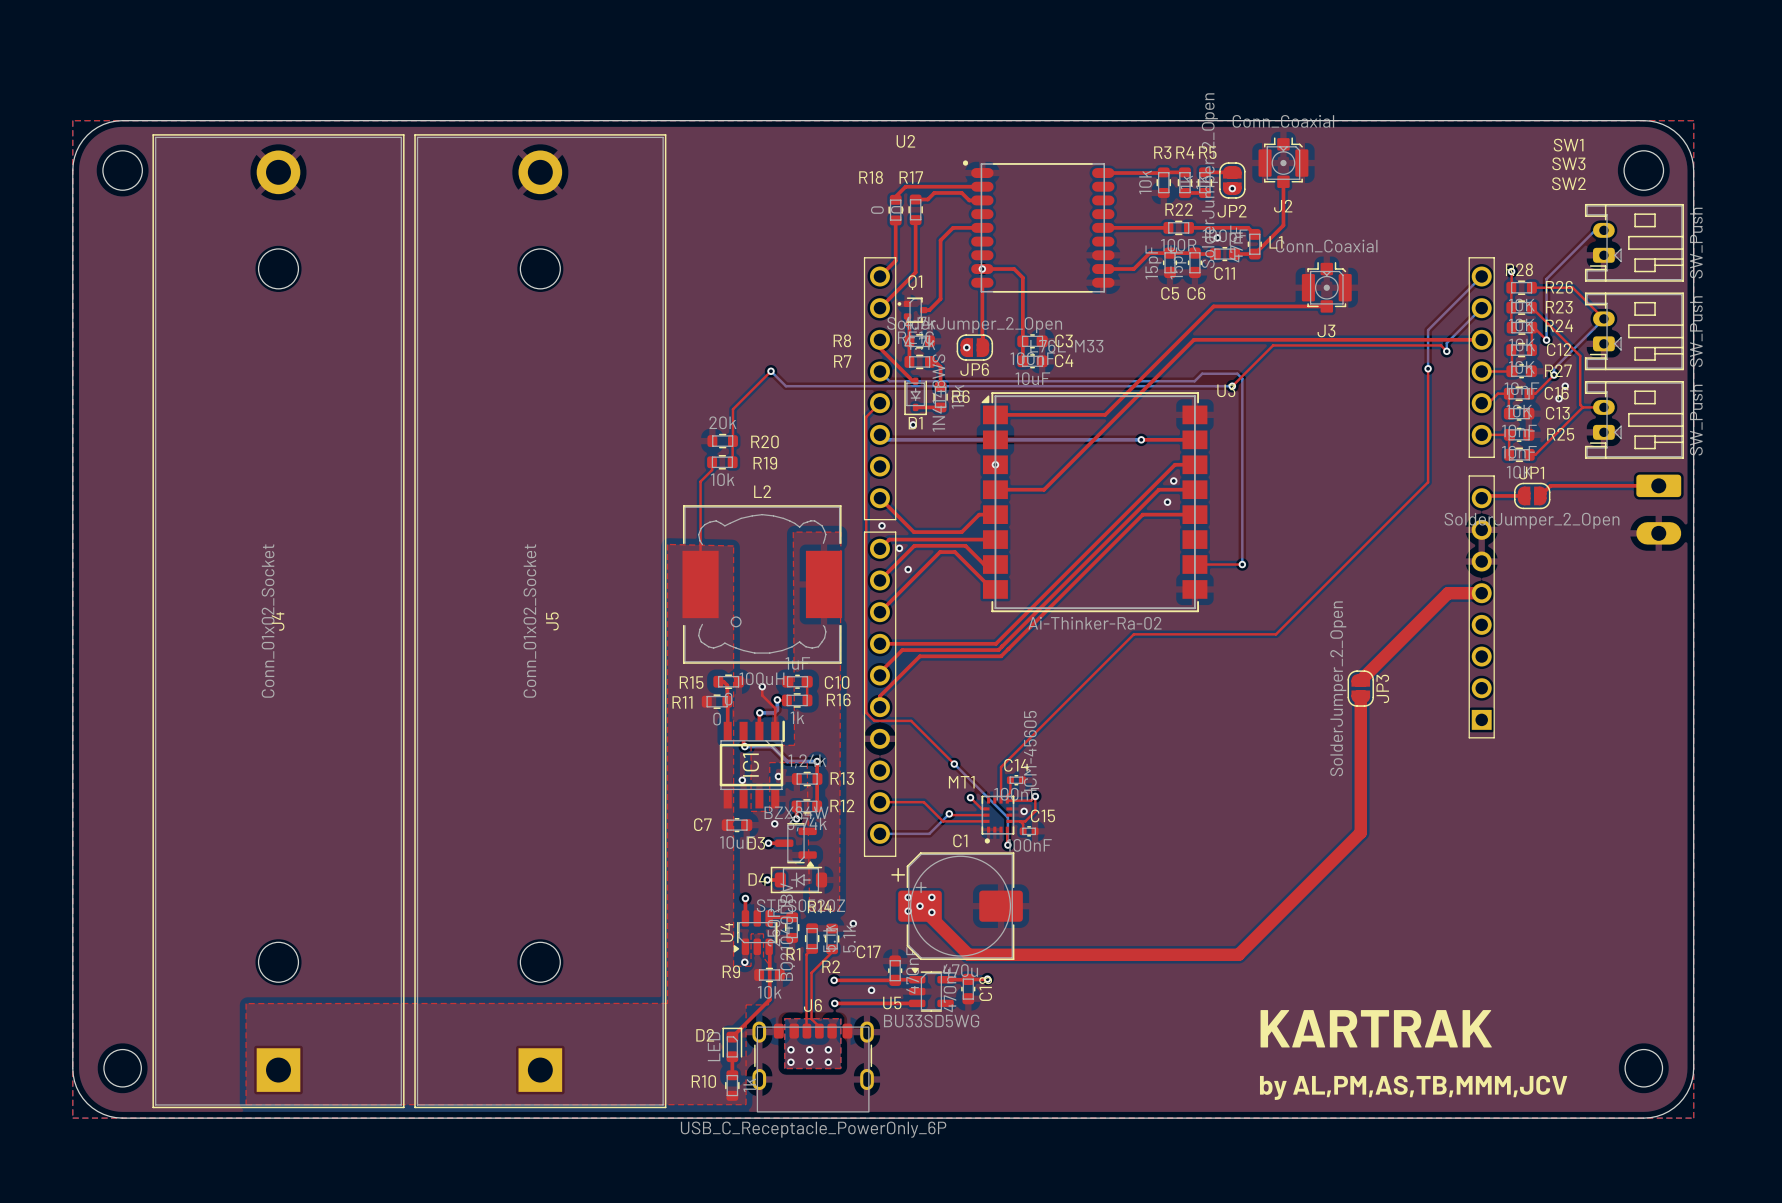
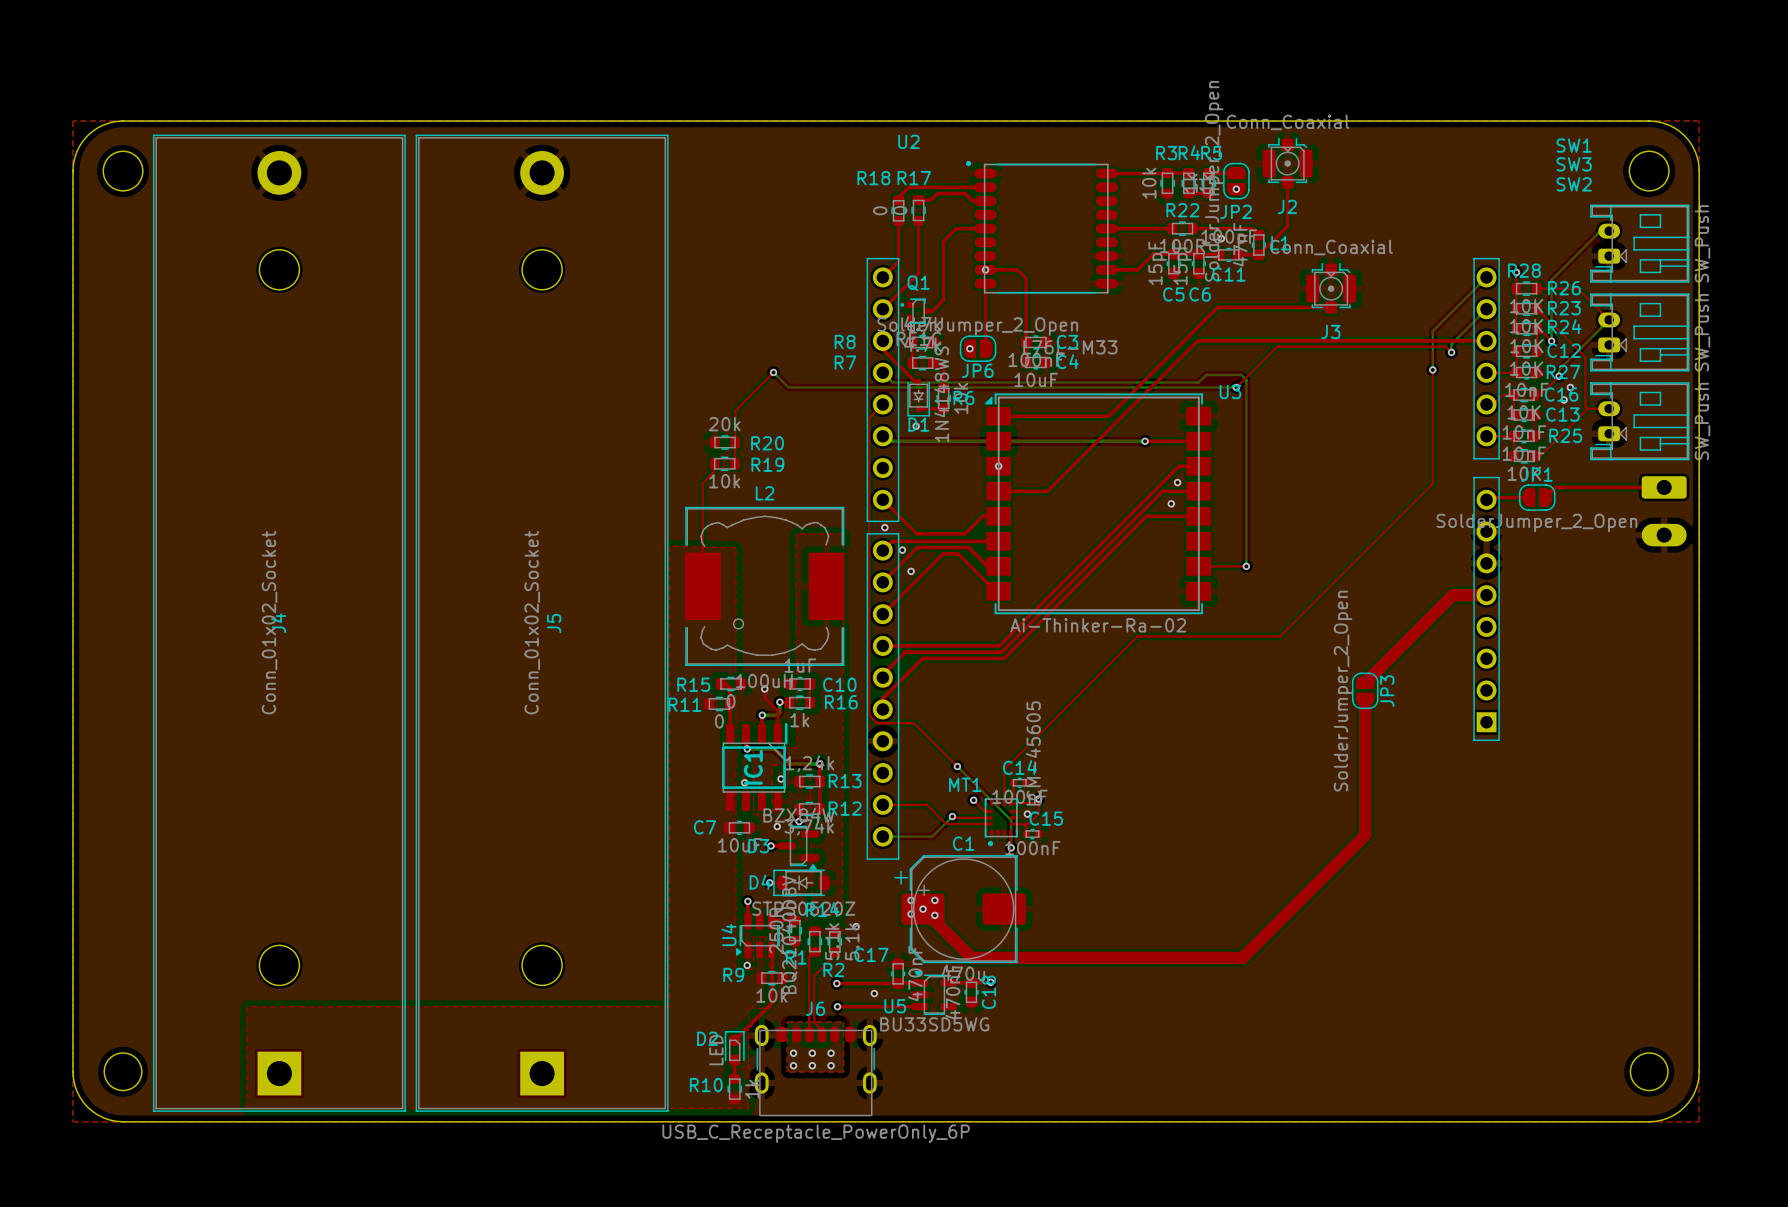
text: KARTRAK (1376, 1028) -> none
text: by AL,PM,AS,TB,MMM,JCV (1413, 1087) -> none

